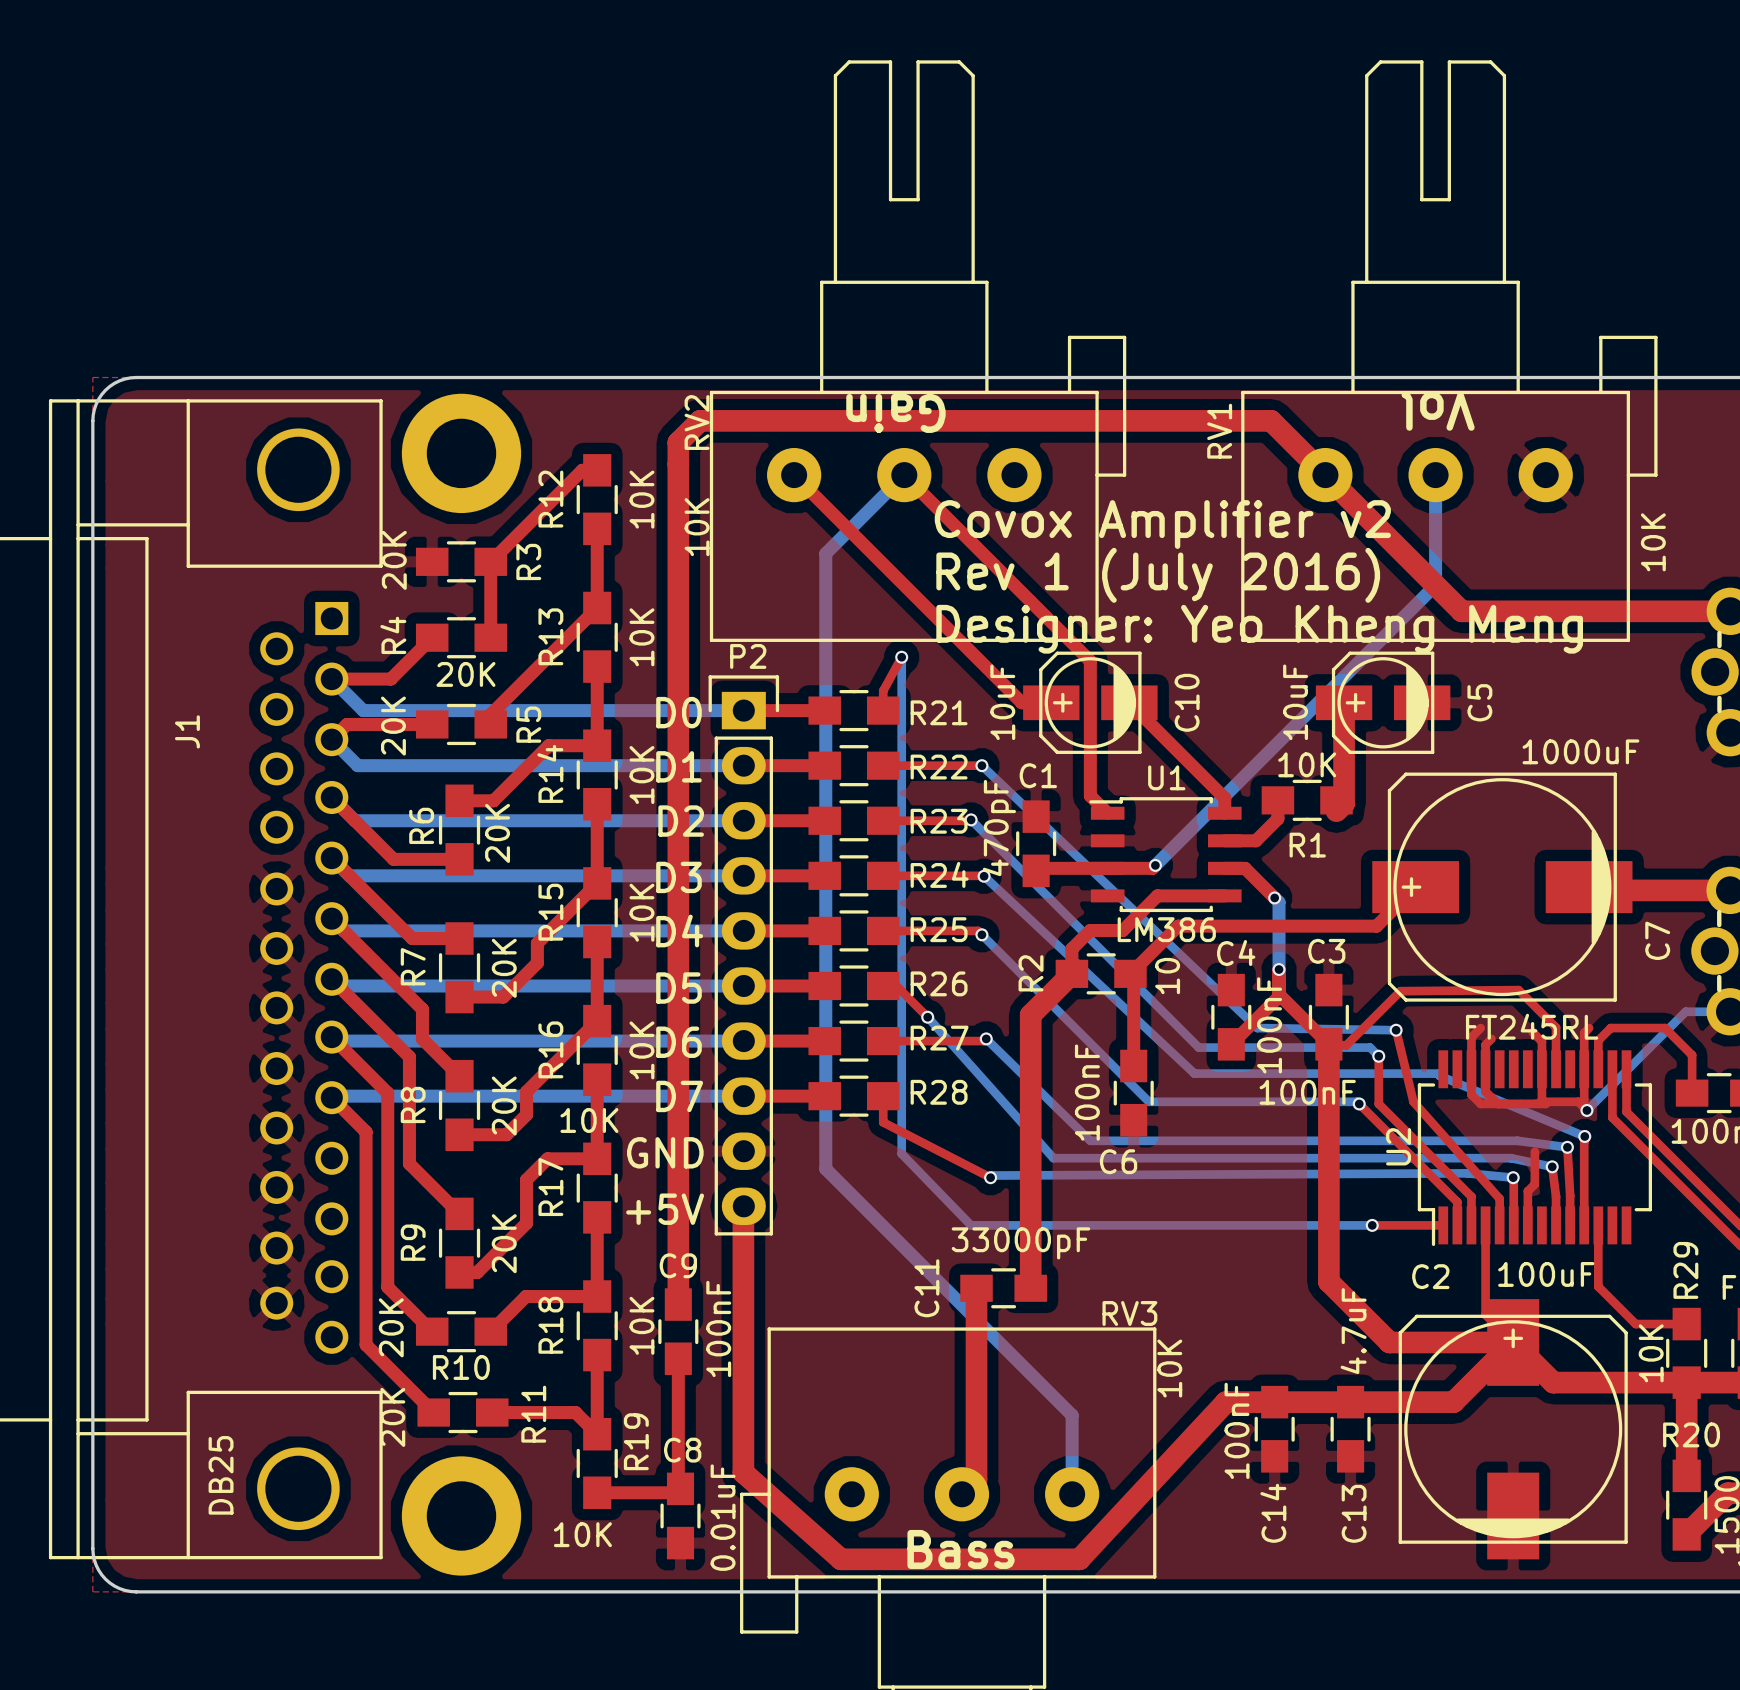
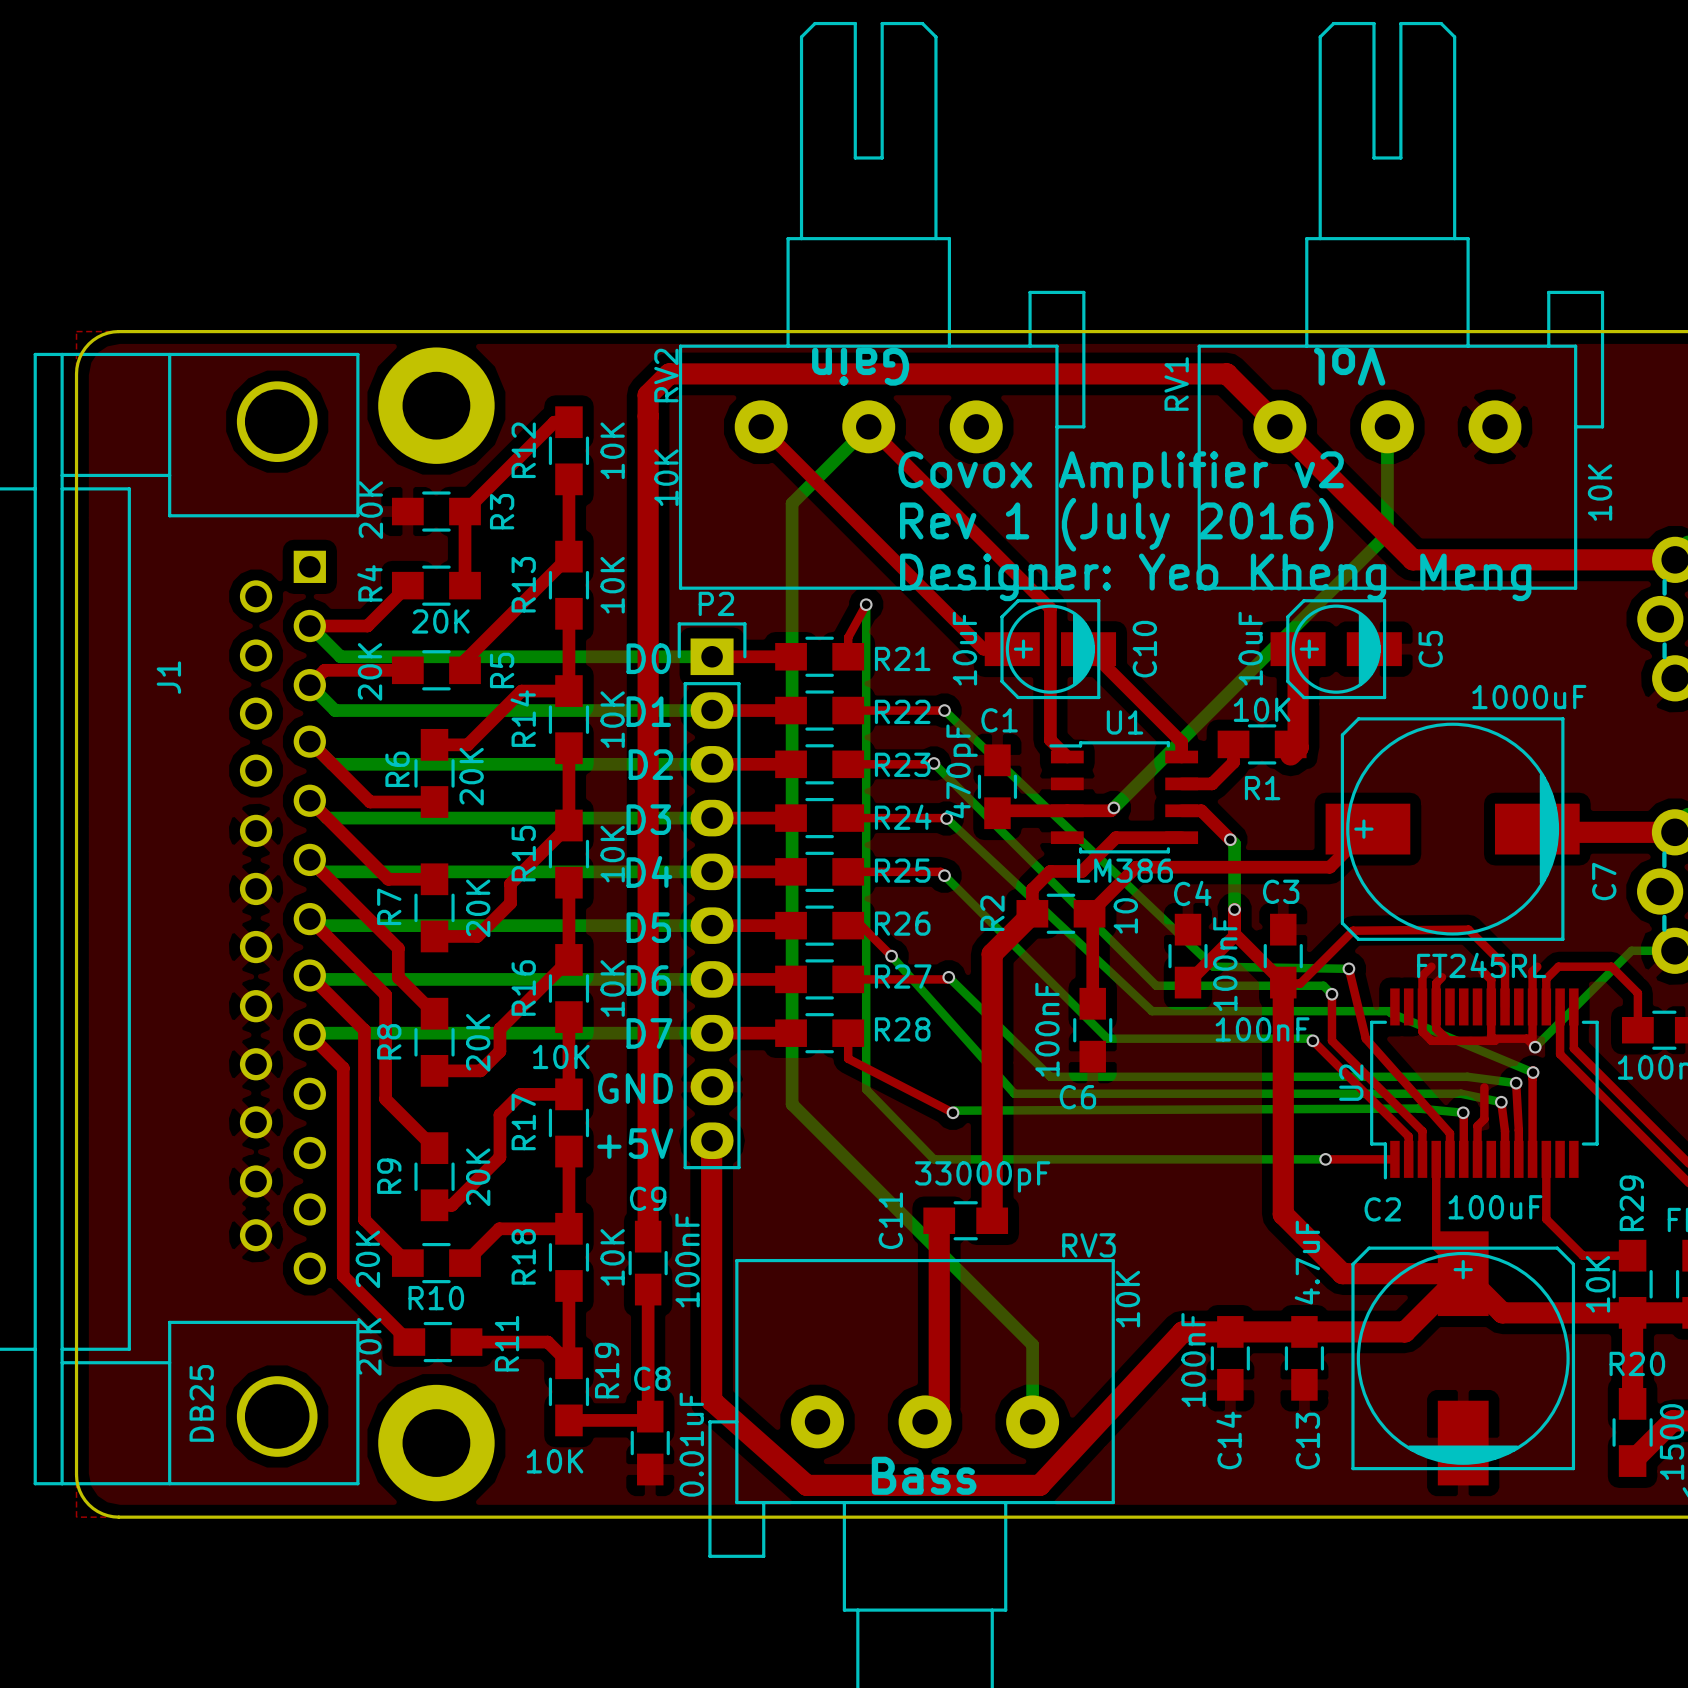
text position: Vol (1438, 411) -> Vol (1349, 366)

